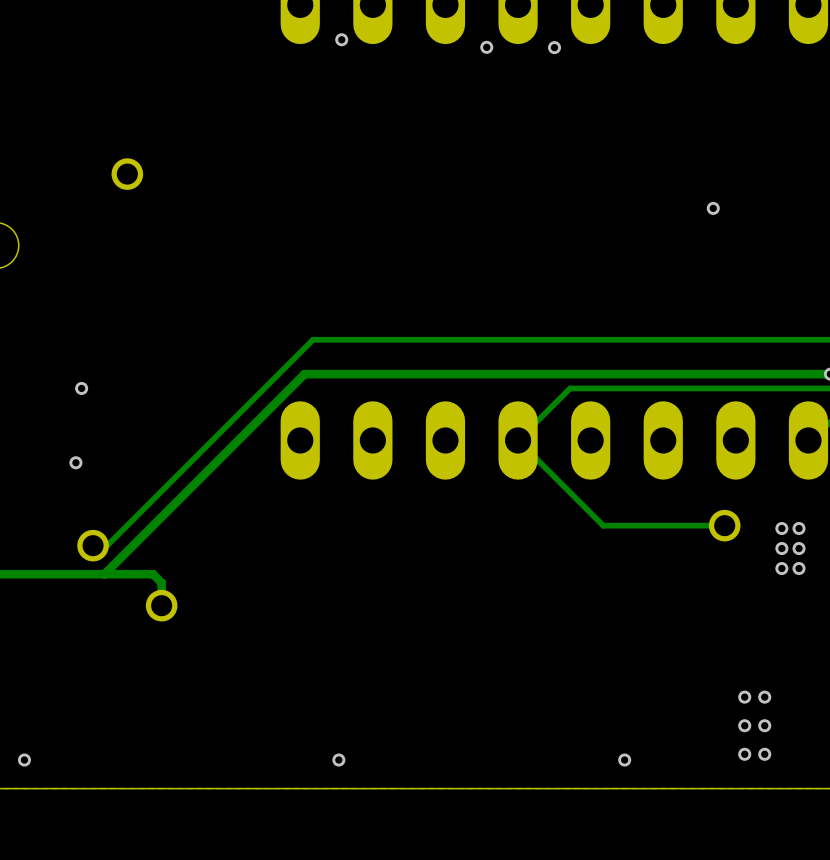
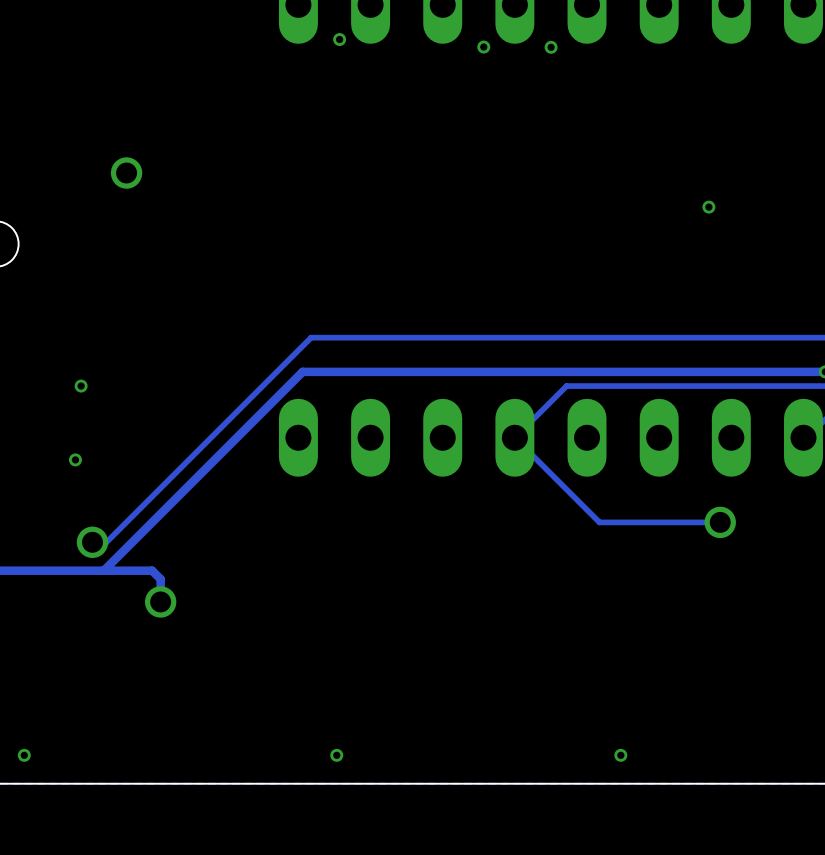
via: (781, 528) -> none
via: (799, 528) -> none
via: (781, 548) -> none
via: (799, 548) -> none
via: (781, 568) -> none
via: (799, 568) -> none
via: (744, 697) -> none
via: (764, 697) -> none
via: (744, 725) -> none
via: (764, 725) -> none
via: (744, 754) -> none
via: (764, 754) -> none

